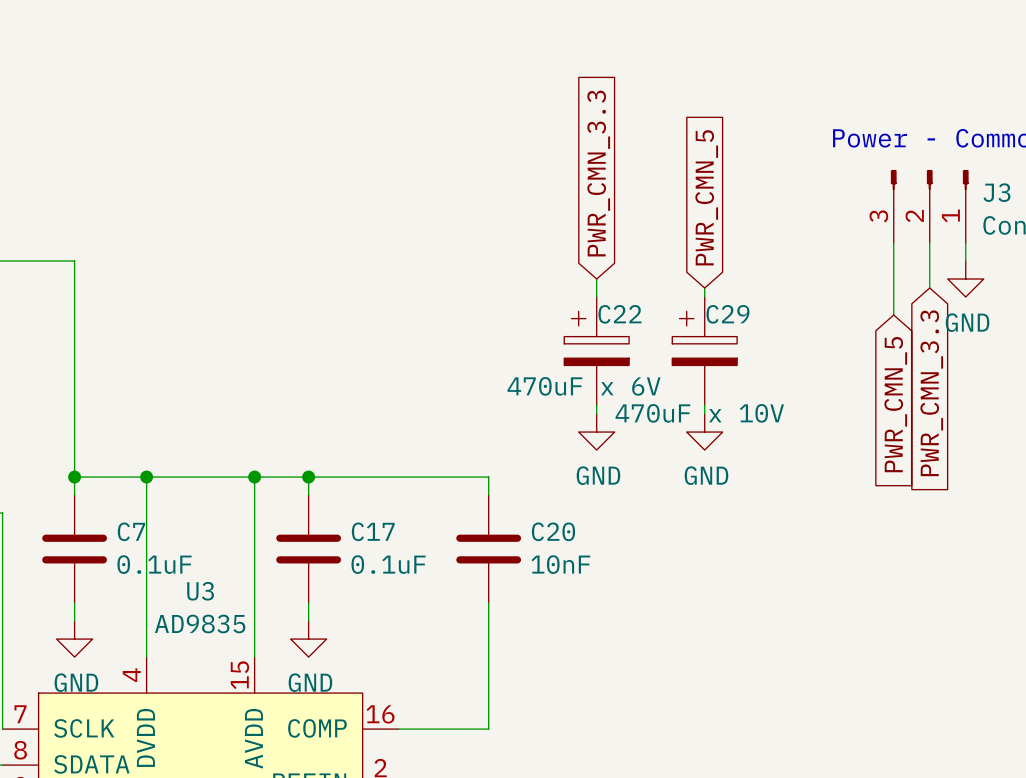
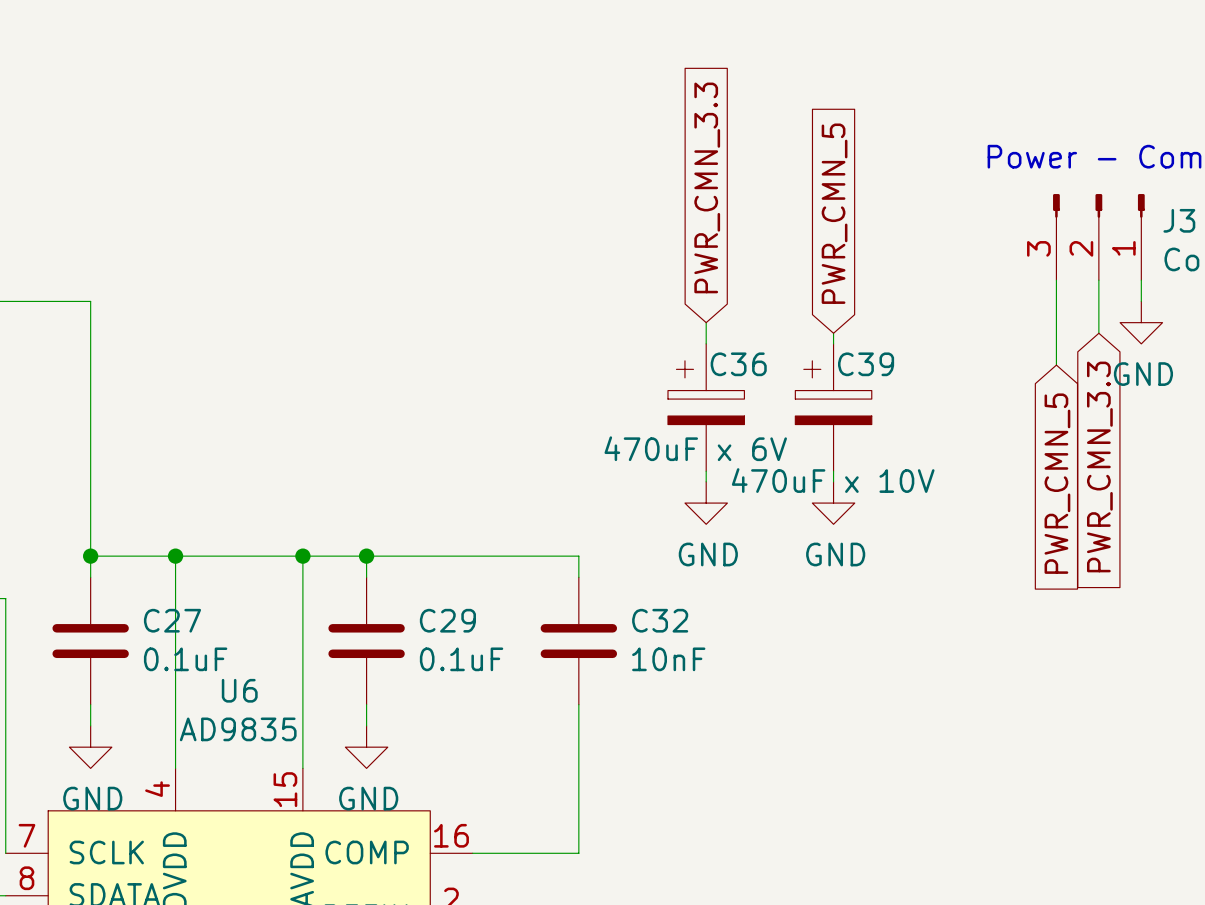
C22 name: C22 (619, 314) -> C36 (738, 364)
C29 name: C29 (727, 314) -> C39 (866, 364)
C7 name: C7 (131, 531) -> C27 (172, 620)
C17 name: C17 (373, 531) -> C29 (447, 620)
C20 name: C20 (553, 531) -> C32 (660, 620)
U3 name: U3 (200, 591) -> U6 (239, 690)

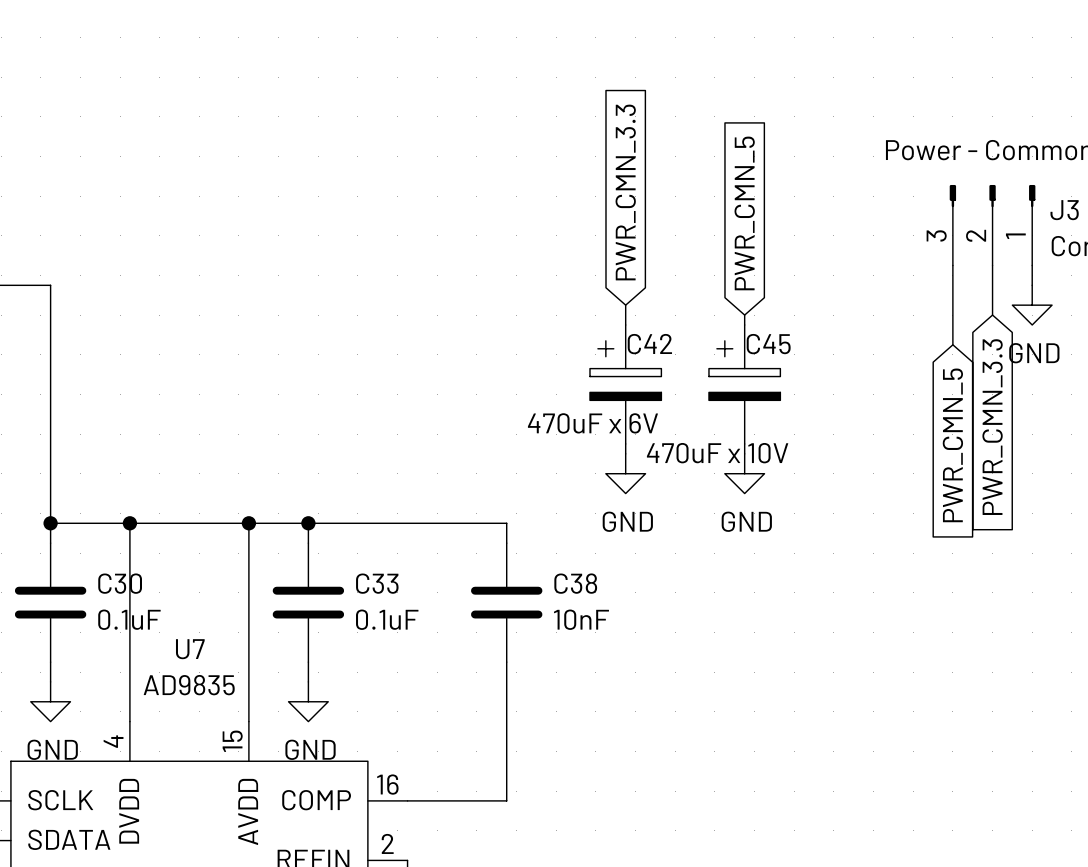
C36 name: C36 (738, 364) -> C42 (649, 344)
C39 name: C39 (866, 364) -> C45 (768, 344)
C27 name: C27 (172, 620) -> C30 (120, 583)
C29 name: C29 (447, 620) -> C33 (377, 583)
C32 name: C32 (660, 620) -> C38 (575, 583)
U6 name: U6 (239, 690) -> U7 (190, 649)

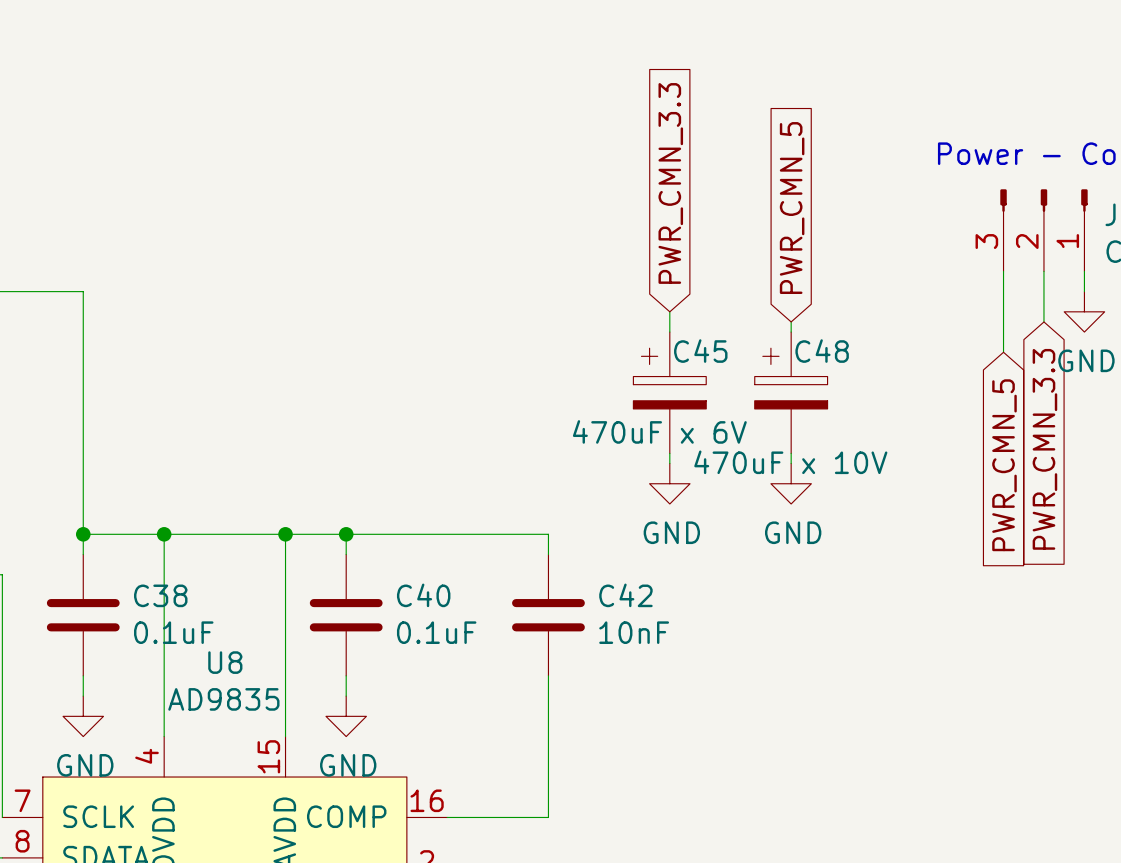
C42 name: C42 (649, 344) -> C45 (700, 351)
C45 name: C45 (768, 344) -> C48 (822, 351)
C30 name: C30 (120, 583) -> C38 (160, 595)
C33 name: C33 (377, 583) -> C40 (423, 595)
C38 name: C38 (575, 583) -> C42 (625, 595)
U7 name: U7 (190, 649) -> U8 (225, 662)

